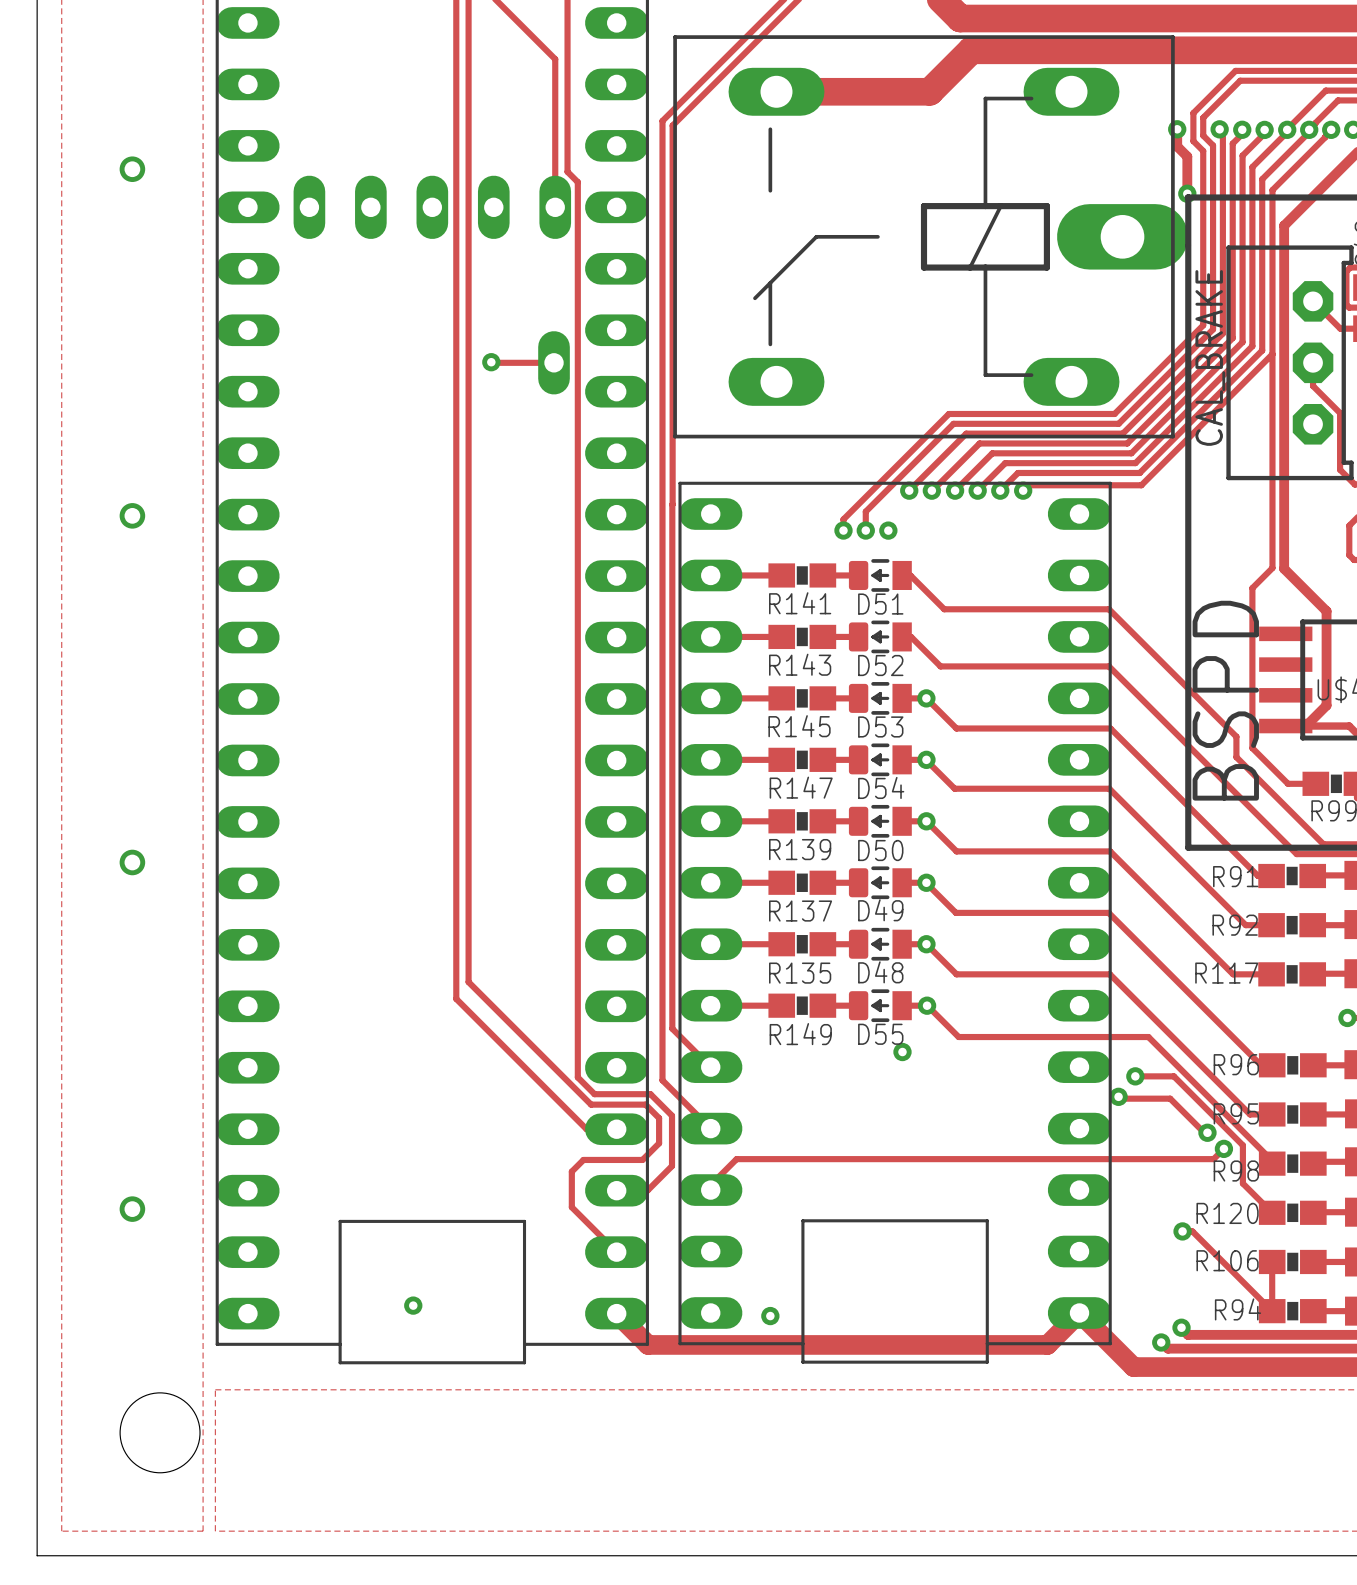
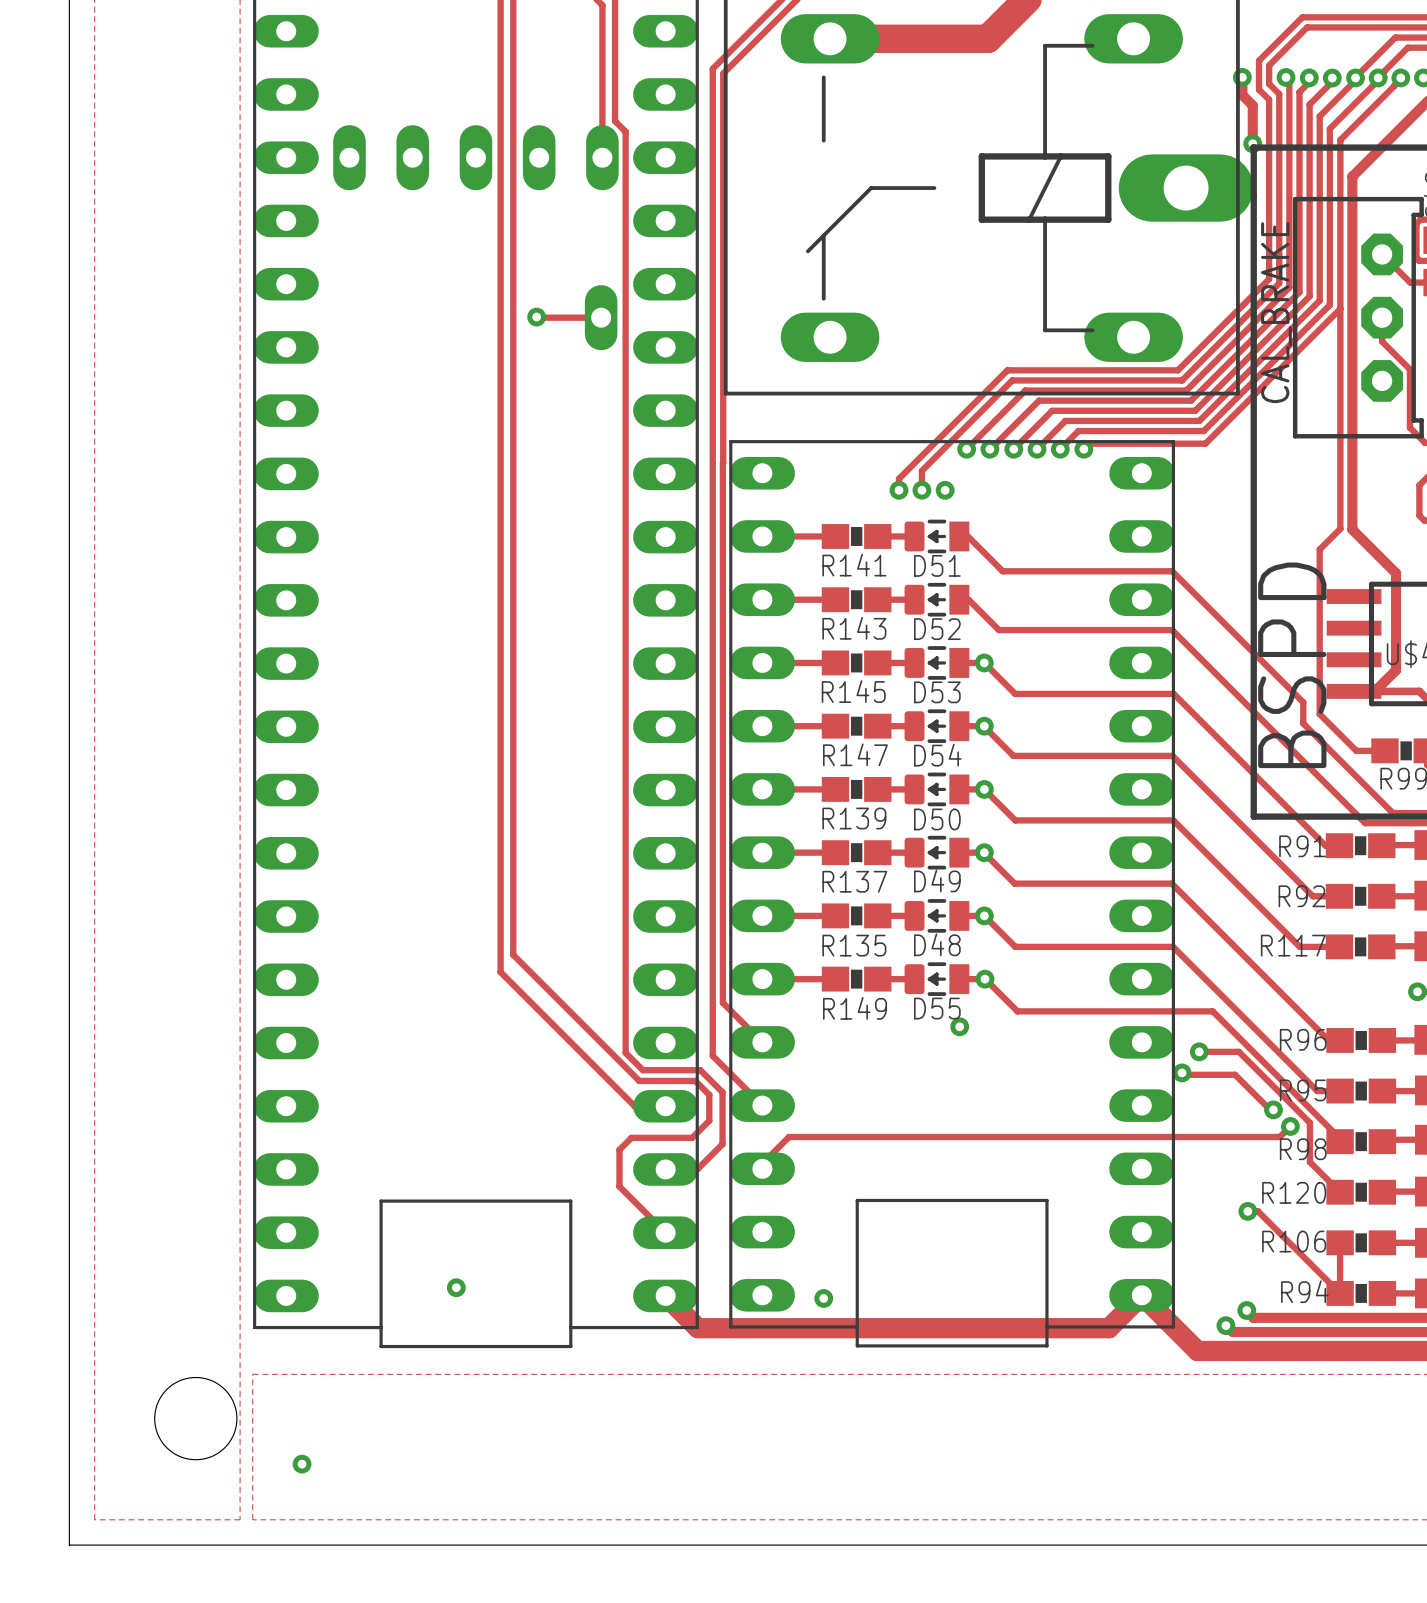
via: (132, 169) -> none
via: (132, 515) -> none
via: (132, 862) -> none
via: (132, 1209) -> none
via: none -> (302, 1464)

